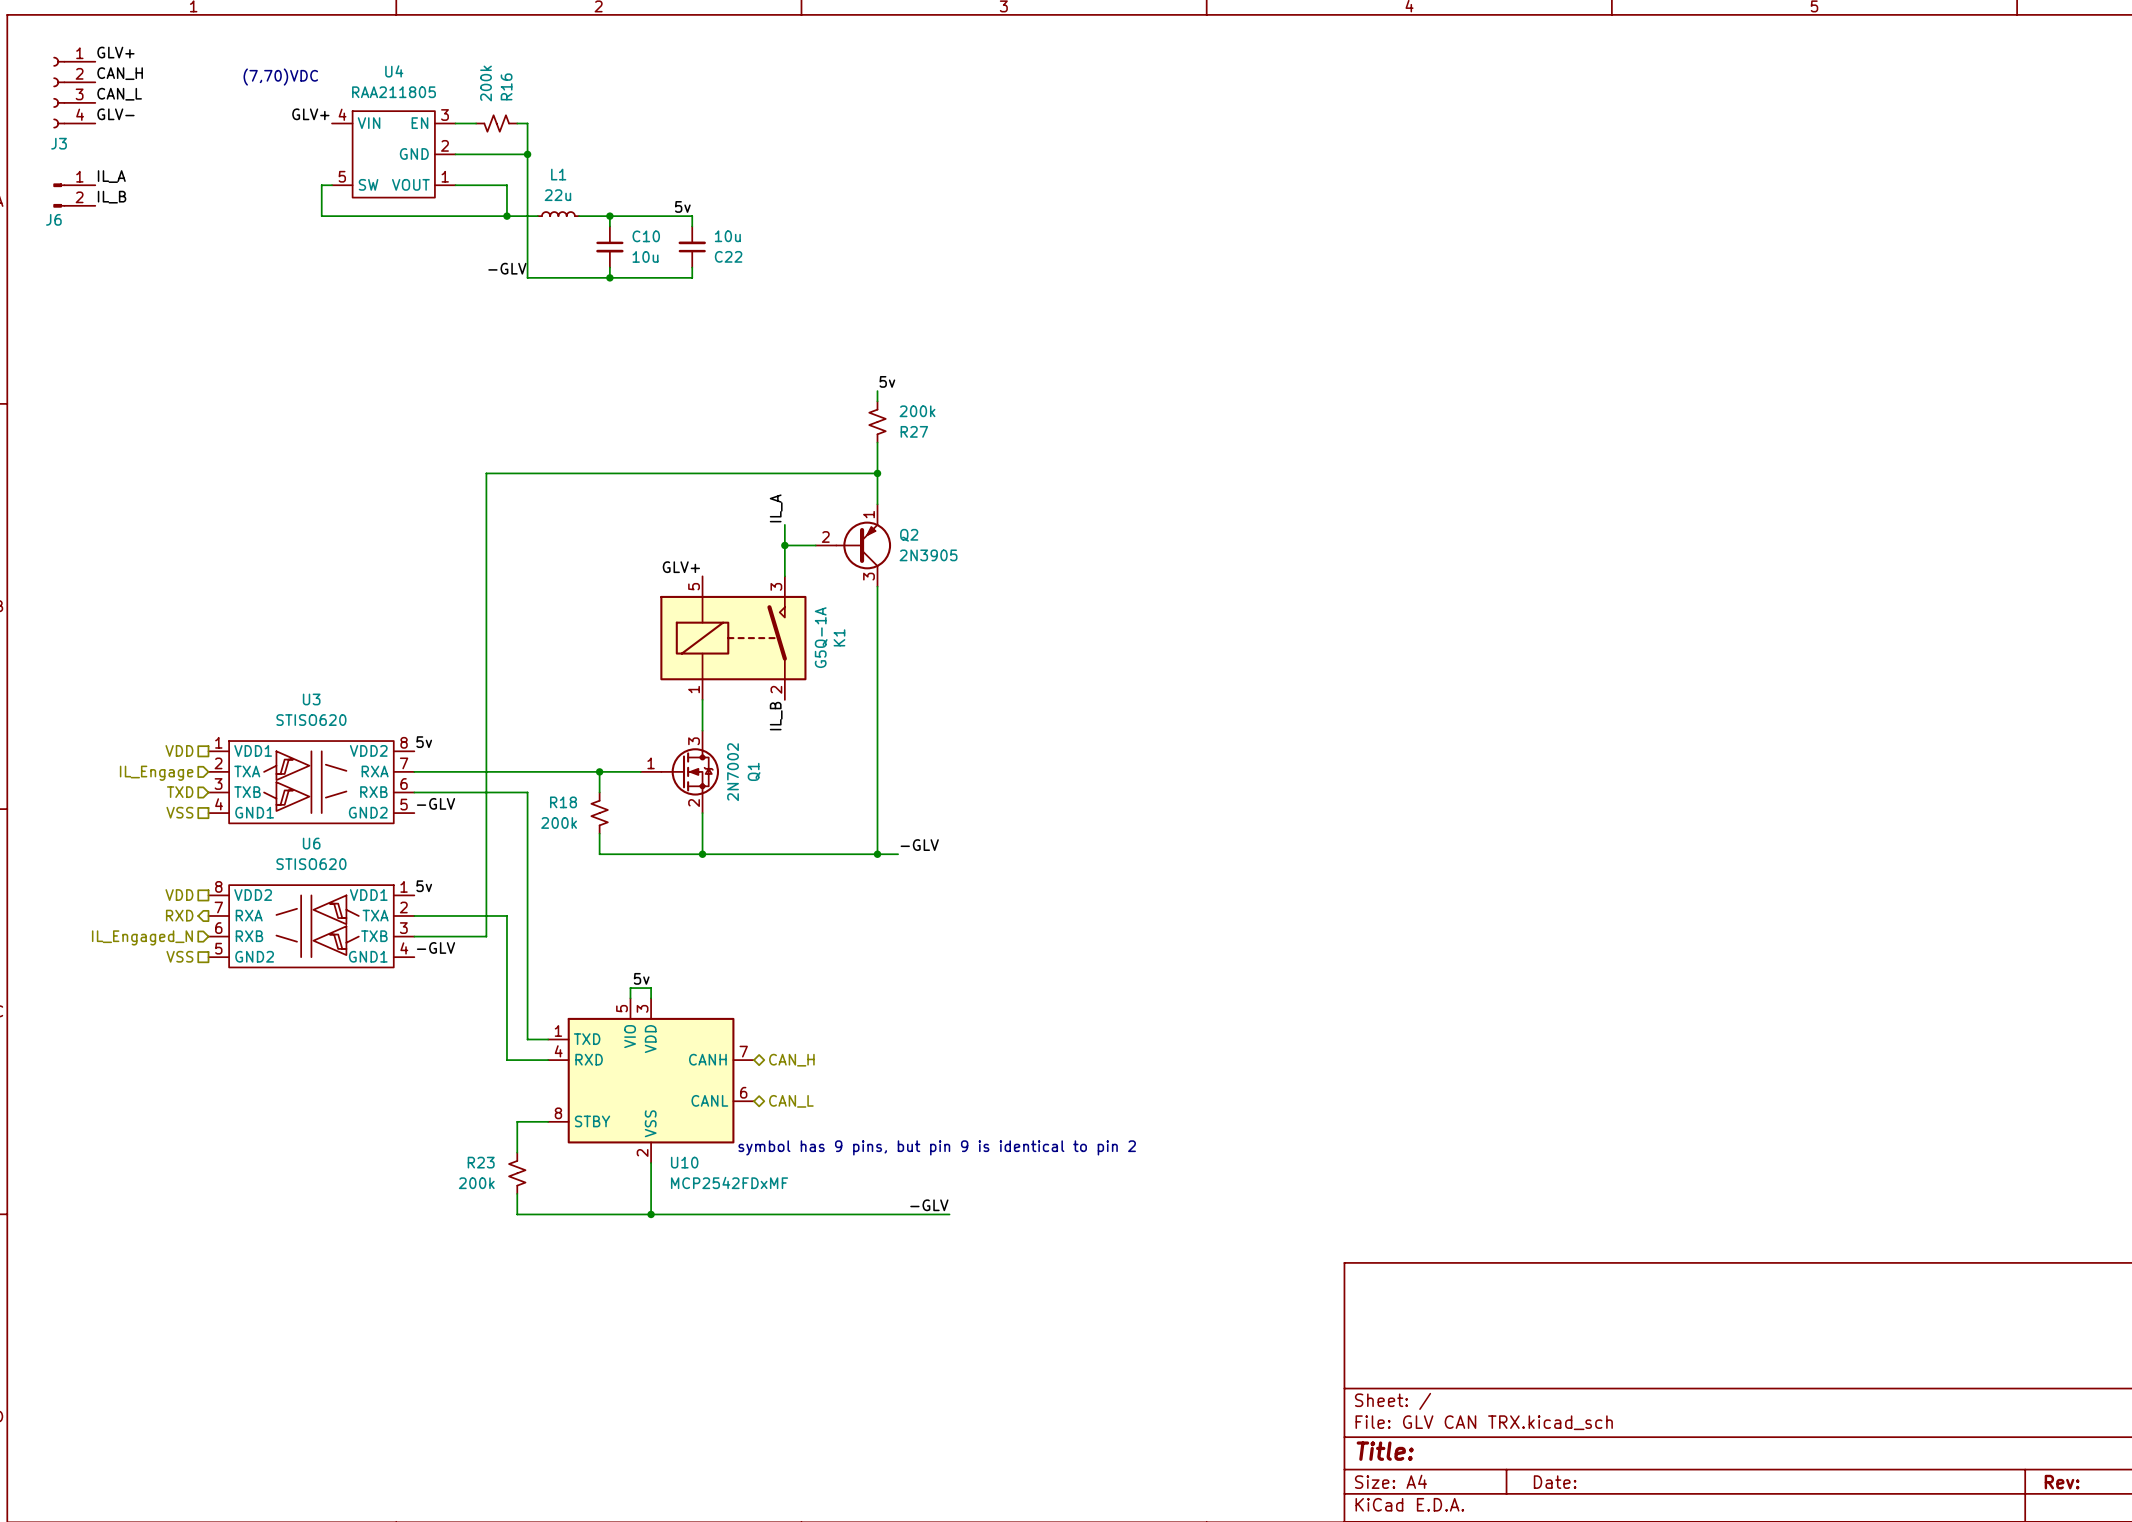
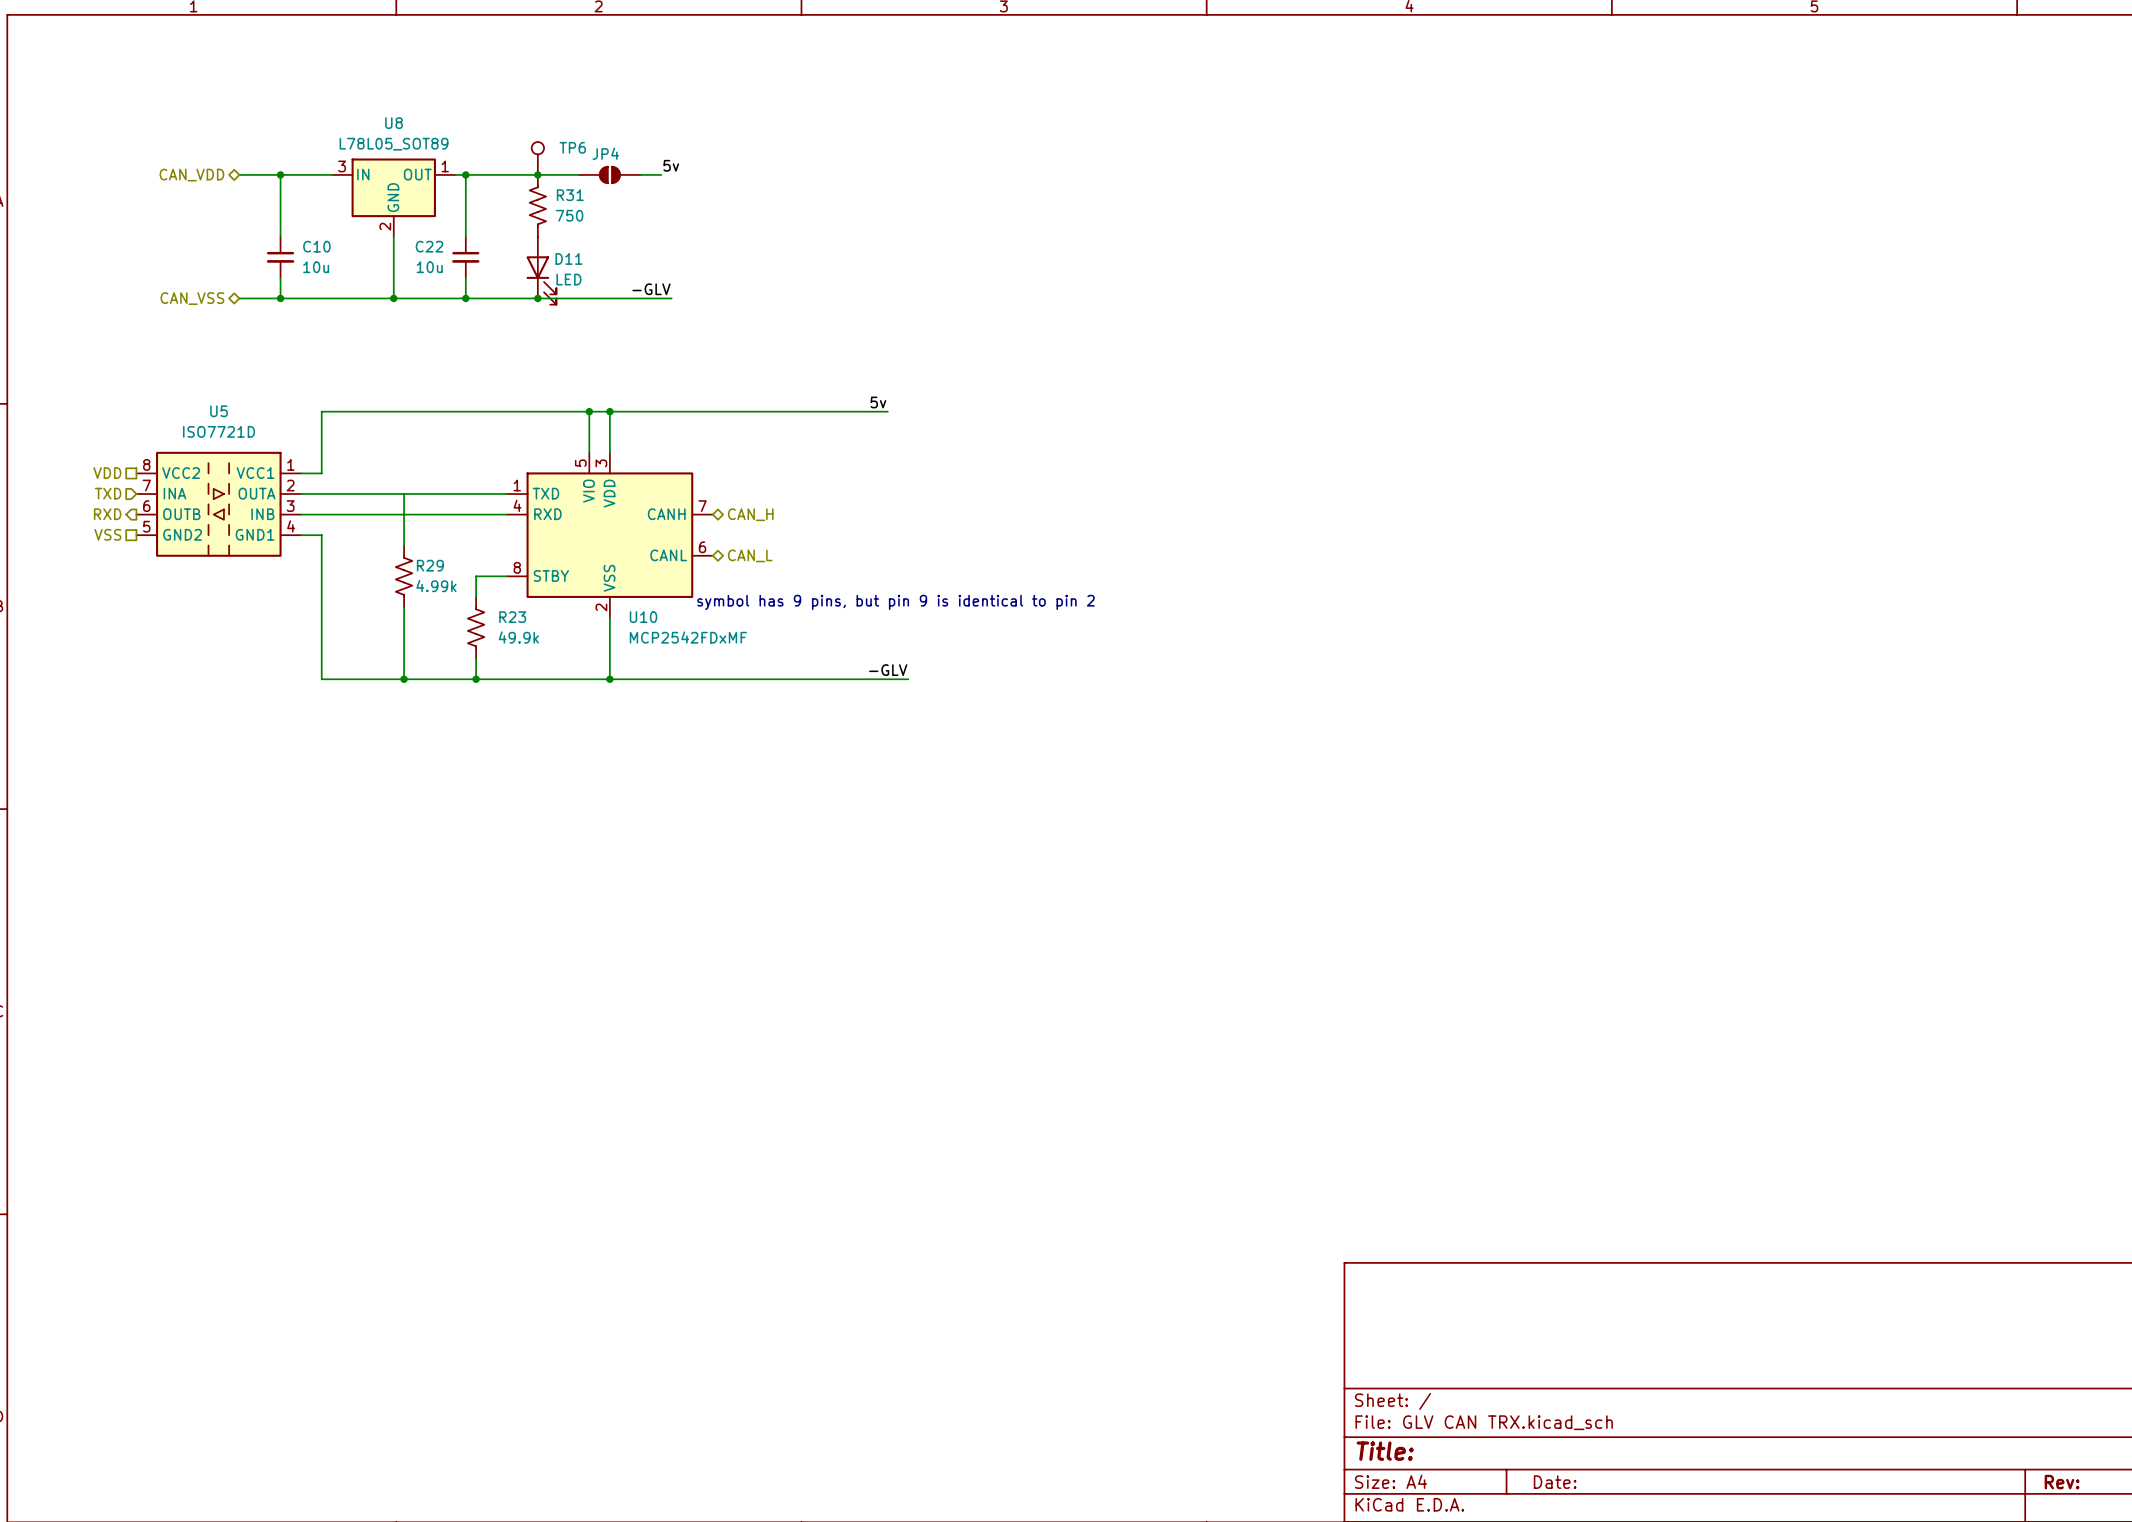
label: GLV+ (115, 52) -> none
label: CAN_H (120, 73) -> none
text: (7,70)VDC (280, 77) -> none
J3: (74, 92) -> none
label: CAN_L (119, 94) -> none
label: GLV- (115, 114) -> none
label: GLV+ (310, 114) -> none
wire: (455, 123) (476, 123) -> (640, 174) (661, 174)
R16: 200k (496, 123) -> none
wire: (517, 123) (527, 123) (527, 277) (692, 277) (692, 267) -> none
U4: RAA211805 (393, 154) -> none
wire: (455, 154) (527, 154) -> none
junction position: (527, 154) -> (537, 174)
TP6: none -> (537, 158)
wire: none -> (239, 174) (332, 174)
wire: none -> (280, 174) (280, 236)
junction: none -> (280, 174)
wire: none -> (455, 174) (579, 174)
wire: none -> (465, 174) (465, 236)
junction: none -> (465, 174)
JP4: none -> (609, 174)
hierarchical label: none -> CAN_VDD (191, 175)
label: IL_A (111, 176) -> none
wire: (332, 185) (321, 185) (321, 216) (537, 216) -> none
wire: (455, 185) (506, 185) (506, 216) -> none
J6: (74, 195) -> none
label: IL_B (112, 197) -> none
U8: none -> L78L05_SOT89 (393, 197)
R31: none -> 750 (537, 205)
label position: 5v (682, 206) -> 5v (671, 165)
L1: 22u (558, 214) -> none
junction: (506, 216) -> none
wire: (579, 216) (692, 216) (692, 226) -> none
wire: (609, 216) (609, 226) -> none
junction: (609, 216) -> none
wire: none -> (393, 236) (393, 298)
C22 rotation: 0° (692, 246) -> 180° (465, 257)
C10 position: (609, 247) -> (280, 257)
C22 position: (692, 247) -> (465, 257)
wire: (609, 267) (609, 277) -> none
label position: -GLV (507, 268) -> -GLV (651, 289)
D11: none -> LED (541, 270)
wire: none -> (280, 277) (280, 298)
wire: none -> (465, 277) (465, 298)
junction: (609, 277) -> none
hierarchical label: none -> CAN_VSS (192, 298)
wire: none -> (239, 298) (671, 298)
junction: none -> (280, 298)
junction: none -> (393, 298)
junction: none -> (465, 298)
junction: none -> (537, 298)
label position: 5v (887, 381) -> 5v (878, 402)
wire: (877, 391) (877, 401) -> none
wire: none -> (589, 411) (589, 452)
junction: none -> (589, 411)
wire: none -> (609, 411) (609, 452)
junction: none -> (609, 411)
wire: none -> (887, 411) (321, 411) (321, 473) (301, 473)
R27: 200k (877, 421) -> none
wire: (877, 442) (877, 504) -> none
hierarchical label: none -> VDD (107, 473)
wire: (877, 473) (486, 473) (486, 936) (414, 936) -> none
junction: (877, 473) -> none
hierarchical label: none -> TXD (108, 493)
wire: none -> (301, 494) (506, 494)
wire: none -> (404, 494) (404, 545)
U5: none -> ISO7721D (218, 504)
label: IL_A (776, 508) -> none
hierarchical label: none -> RXD (107, 514)
wire: none -> (301, 514) (506, 514)
hierarchical label: none -> CAN_H (750, 514)
wire: (784, 524) (784, 576) -> none
hierarchical label: none -> VSS (107, 534)
wire: none -> (301, 535) (321, 535) (321, 679) (908, 679)
wire: (784, 545) (815, 545) -> none
junction: (784, 545) -> none
Q2: 2N3905 (853, 545) -> none
hierarchical label: none -> CAN_L (750, 555)
label: GLV+ (681, 567) -> none
R29: none -> 4.99k (404, 576)
wire: none -> (506, 576) (476, 576) (476, 596)
wire: (877, 586) (877, 854) -> none
text: none -> symbol has 9 pins, but pin 9 is identical to pin 2 (896, 602)
wire: none -> (404, 607) (404, 679)
wire: none -> (609, 617) (609, 679)
K1: G5Q-1A (733, 638) -> none
junction: none -> (404, 679)
junction: none -> (476, 679)
junction: none -> (609, 679)
wire: (702, 699) (702, 730) -> none
label: IL_B (776, 716) -> none
label: 5v (424, 742) -> none
hierarchical label: VDD (179, 750) -> none
wire: (414, 771) (640, 771) -> none
wire: (599, 771) (599, 792) -> (476, 658) (476, 679)
junction: (599, 771) -> none
Q1: 2N7002 (679, 771) -> none
hierarchical label: IL_Engage (156, 773) -> none
U3: STISO620 (311, 782) -> none
hierarchical label: TXD (180, 792) -> none
wire: (414, 792) (527, 792) (527, 1039) (548, 1039) -> none
label: -GLV (435, 803) -> none
hierarchical label: VSS (179, 812) -> none
R18: 200k (599, 813) -> none
wire: (702, 813) (702, 854) -> none
wire: (599, 833) (599, 854) (898, 854) -> none
label position: -GLV (919, 845) -> -GLV (888, 670)
junction: (702, 854) -> none
junction: (877, 854) -> none
label: 5v (424, 886) -> none
hierarchical label: VDD (179, 895) -> none
hierarchical label: RXD (179, 915) -> none
wire: (414, 915) (506, 915) (506, 1060) (548, 1060) -> none
U6: STISO620 (311, 926) -> none
hierarchical label: IL_Engaged_N (142, 937) -> none
label: -GLV (435, 947) -> none
hierarchical label: VSS (179, 956) -> none
label: 5v (641, 978) -> none
wire: (630, 998) (630, 988) (651, 988) (651, 998) -> none
hierarchical label: CAN_H (791, 1060) -> none
U10 position: (651, 1080) -> (609, 535)
hierarchical label: CAN_L (791, 1101) -> none
wire: (548, 1121) (517, 1121) (517, 1152) -> none
text: symbol has 9 pins, but pin 9 is identical to pin 2 (937, 1147) -> none
R23 symbol: [509, 1152, 526, 1194] -> [467, 596, 485, 659]
R23 name position: R23 (481, 1162) -> R23 (512, 617)
wire: (651, 1163) (651, 1214) -> none
R23 value: 200k (476, 1183) -> 49.9k (518, 637)
wire: (517, 1193) (517, 1214) (949, 1214) -> none
label: -GLV (929, 1205) -> none
junction: (651, 1214) -> none

